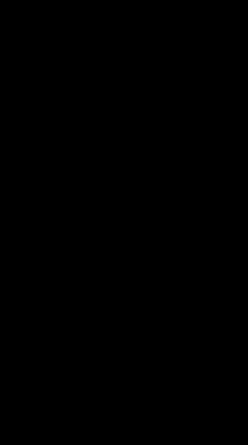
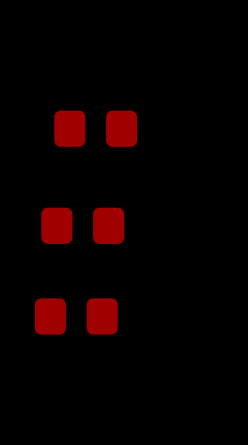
part: none -> (95, 128)
part: none -> (82, 225)
part: none -> (76, 316)

